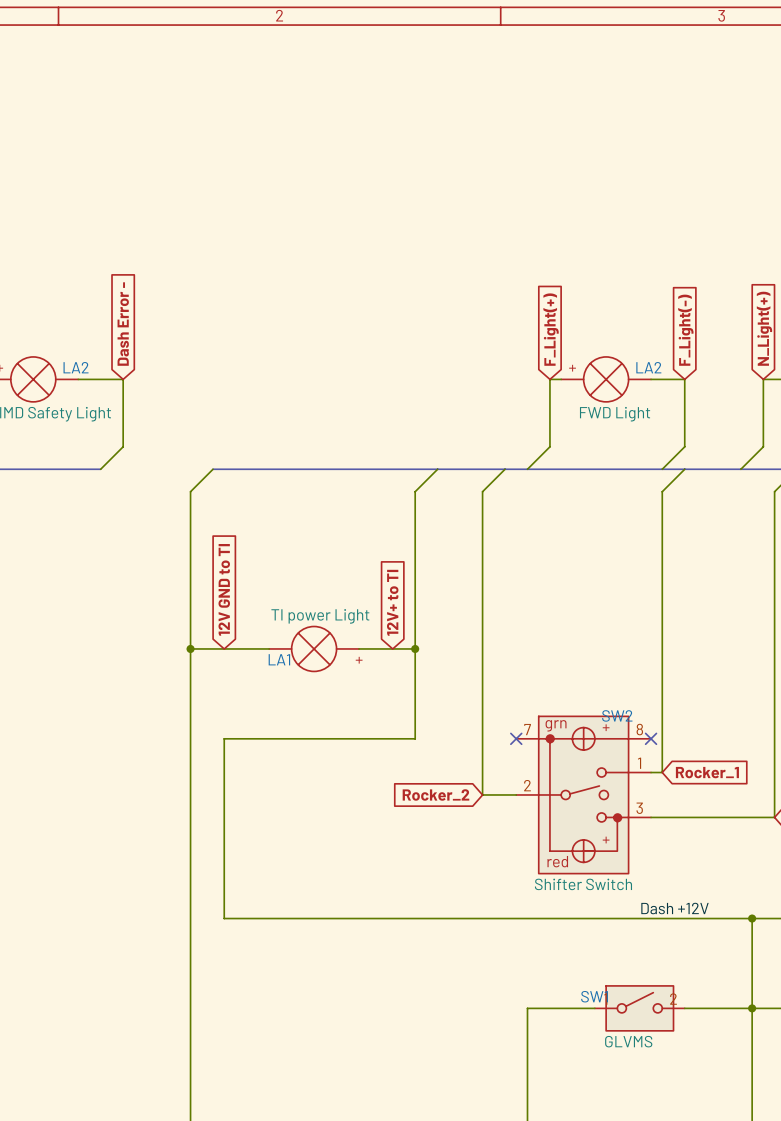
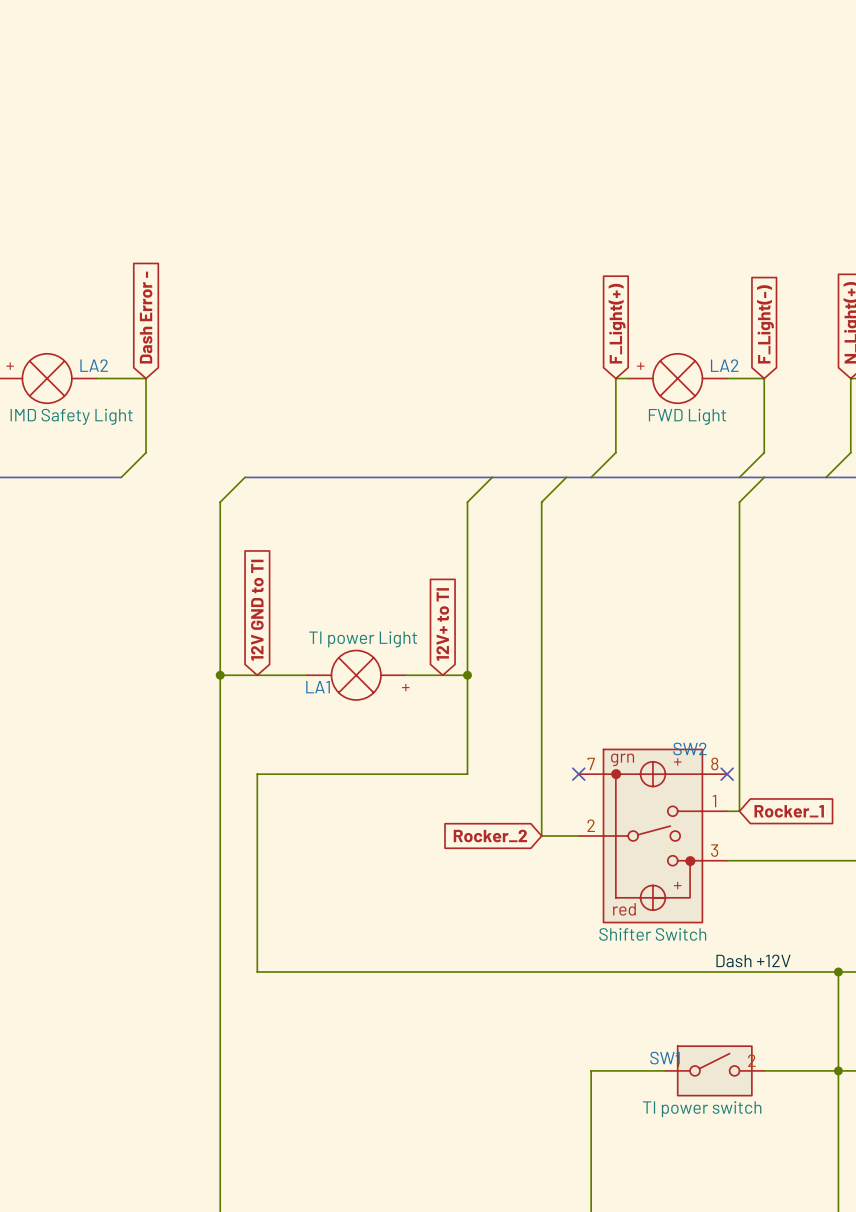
SW1 value: GLVMS (628, 1041) -> TI power switch (702, 1109)

